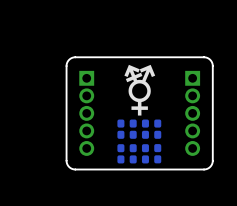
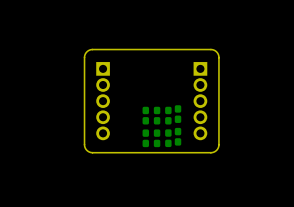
text: ⚧ (139, 90) -> none
part: none -> (178, 114)
part: (120, 129) -> none
part: none -> (178, 136)
part: (120, 153) -> none

